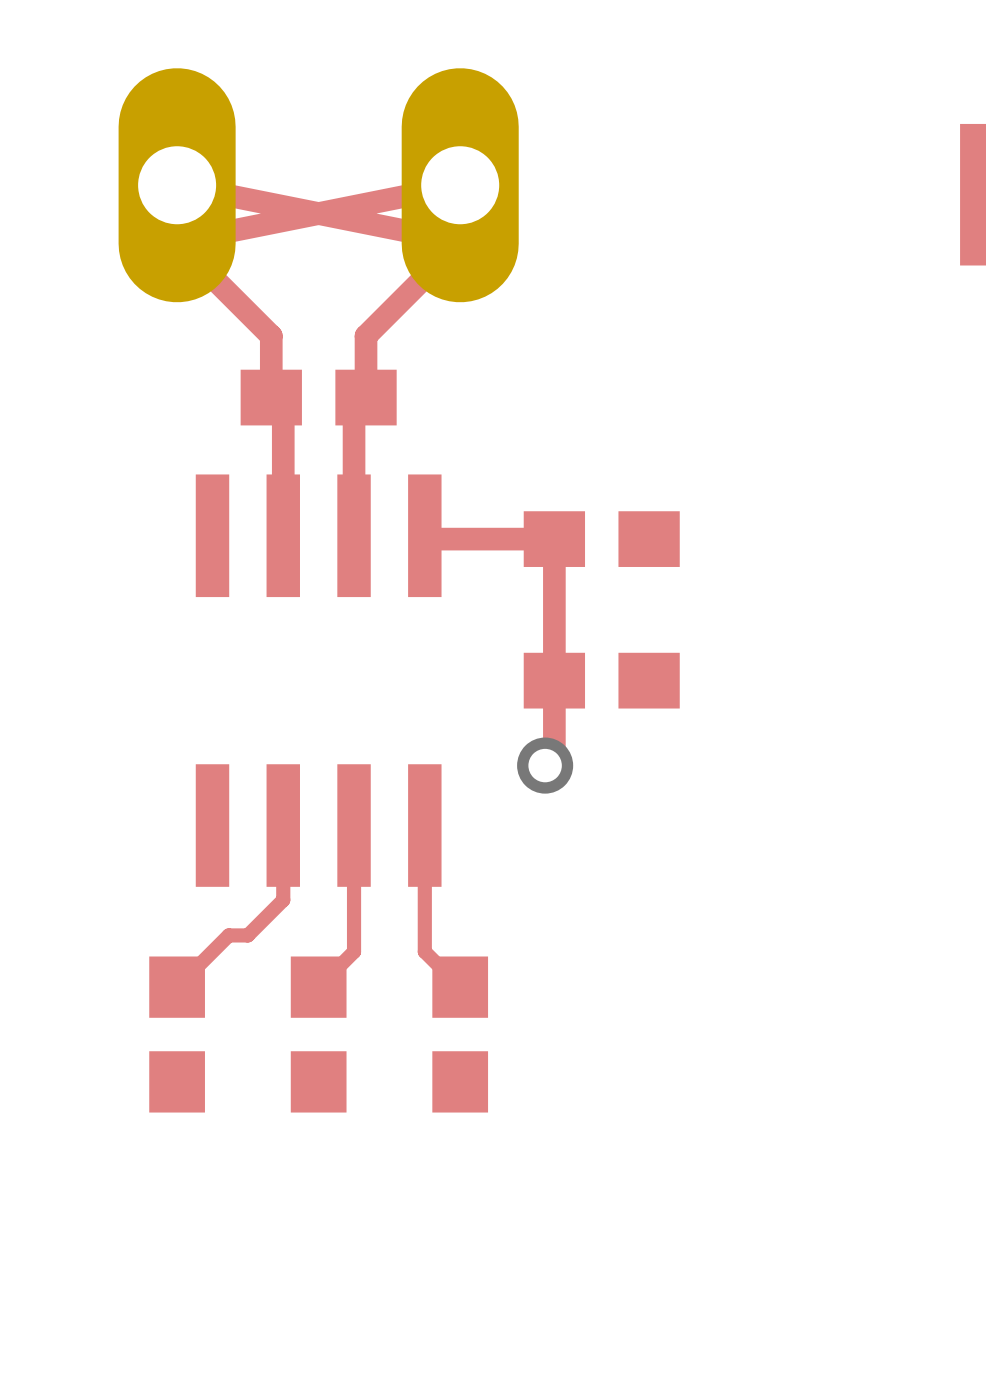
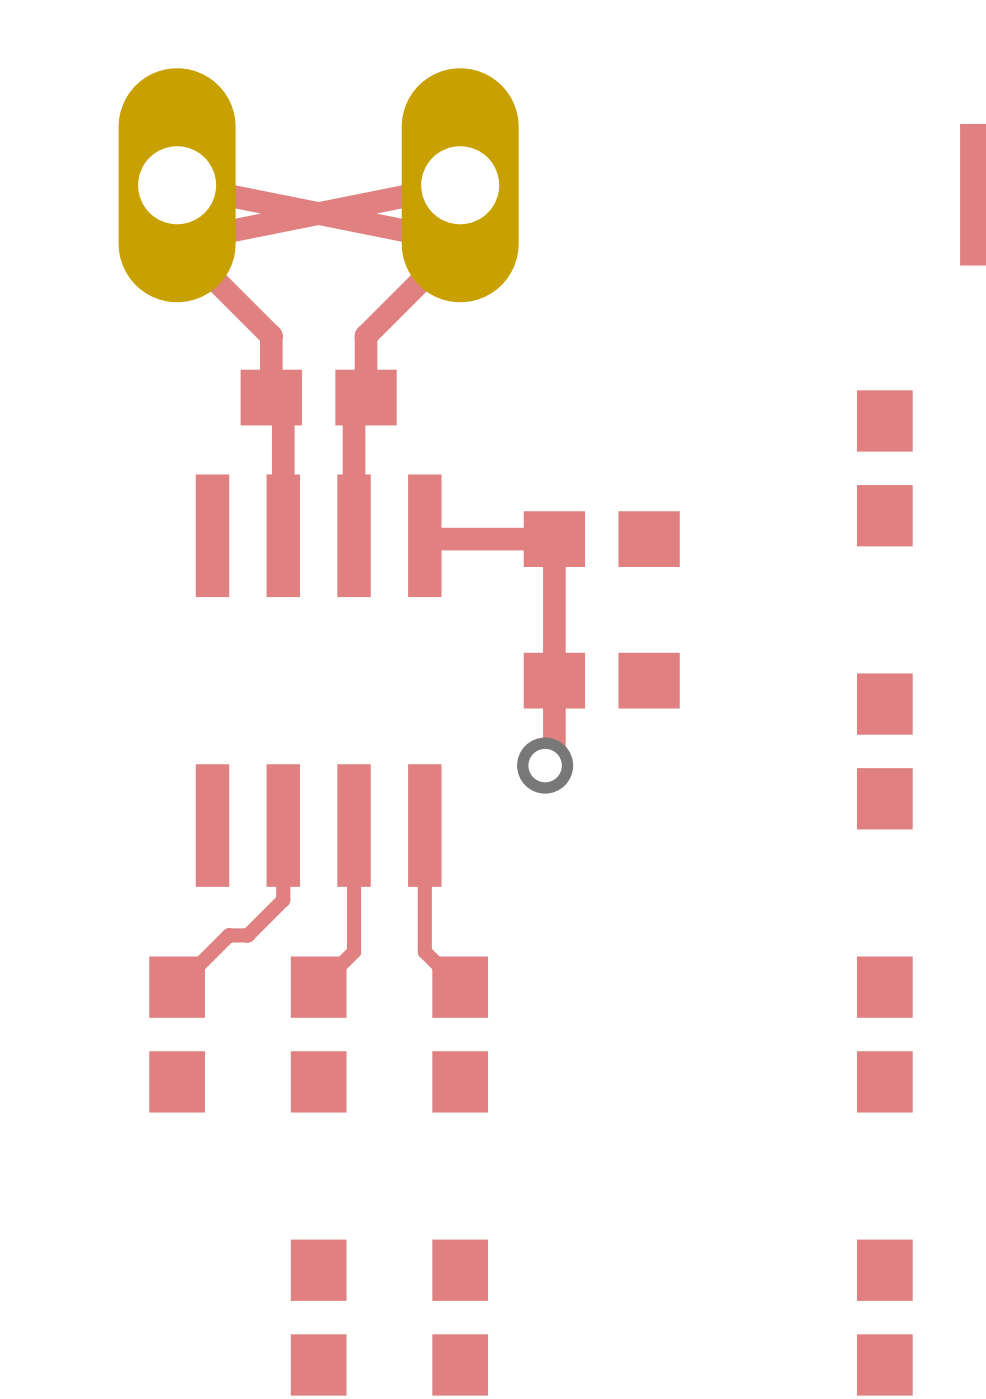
part: none -> (884, 468)
part: none -> (884, 751)
part: none -> (884, 1034)
part: none -> (318, 1317)
part: none -> (460, 1317)
part: none -> (884, 1317)

